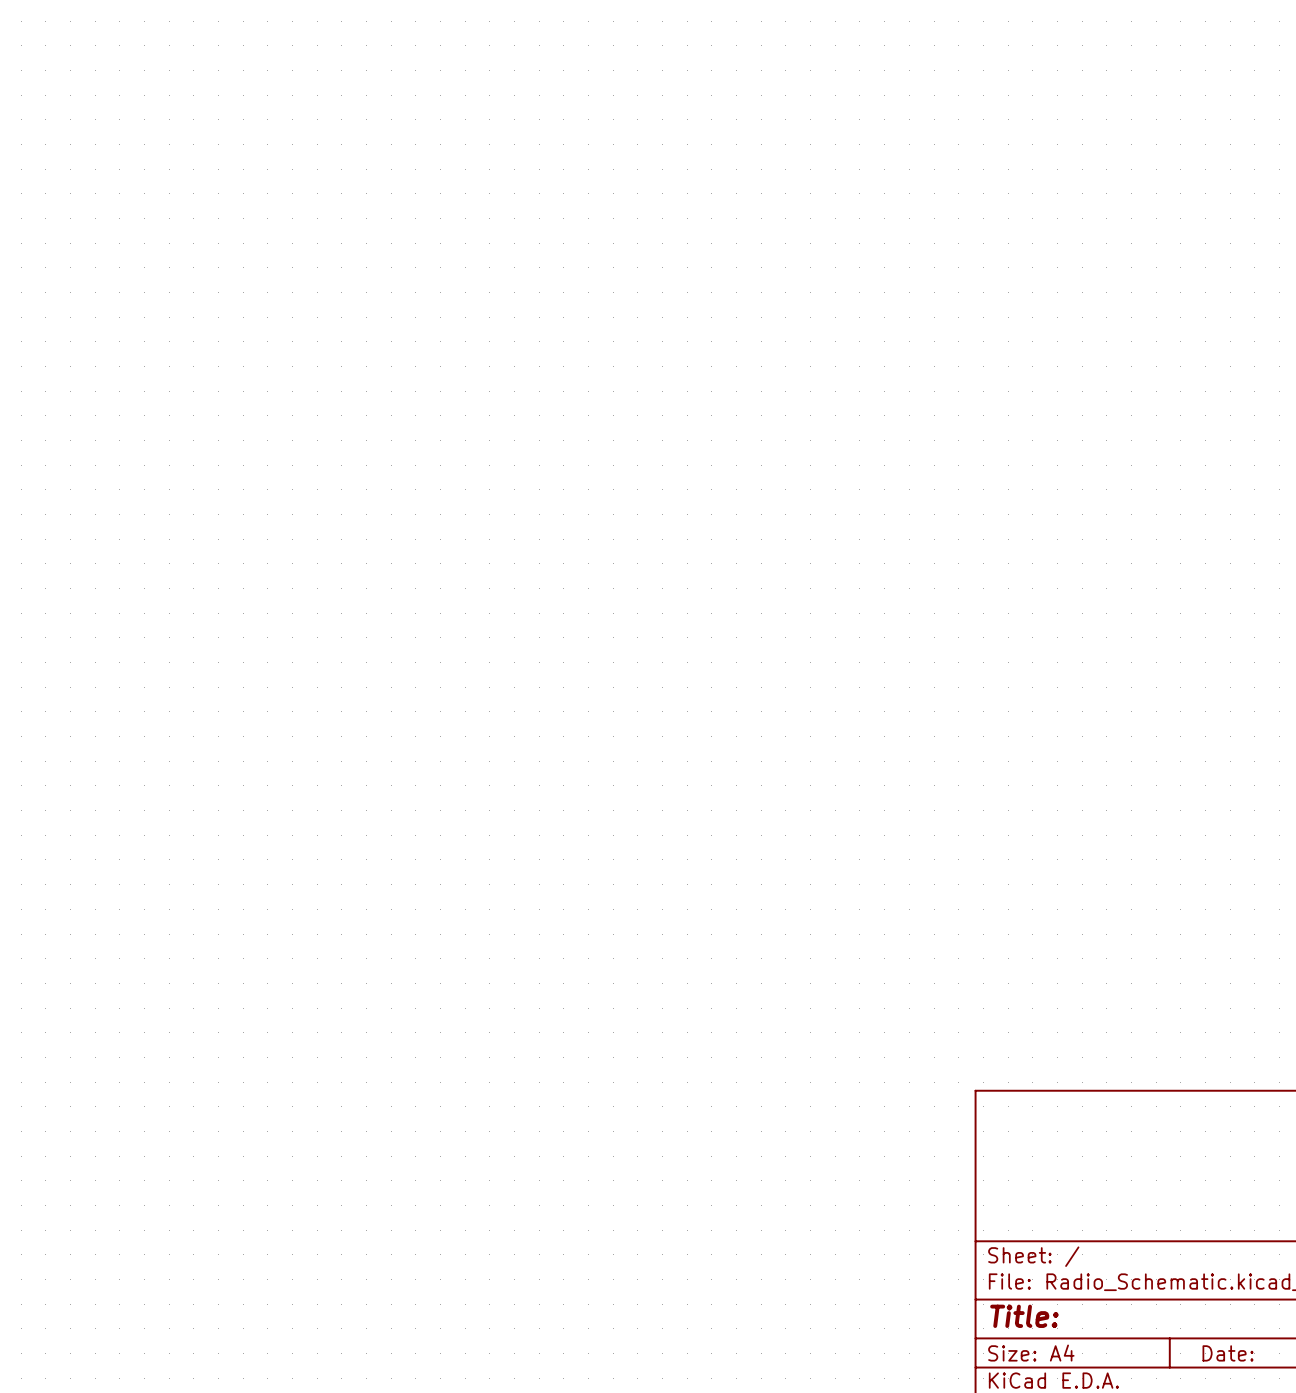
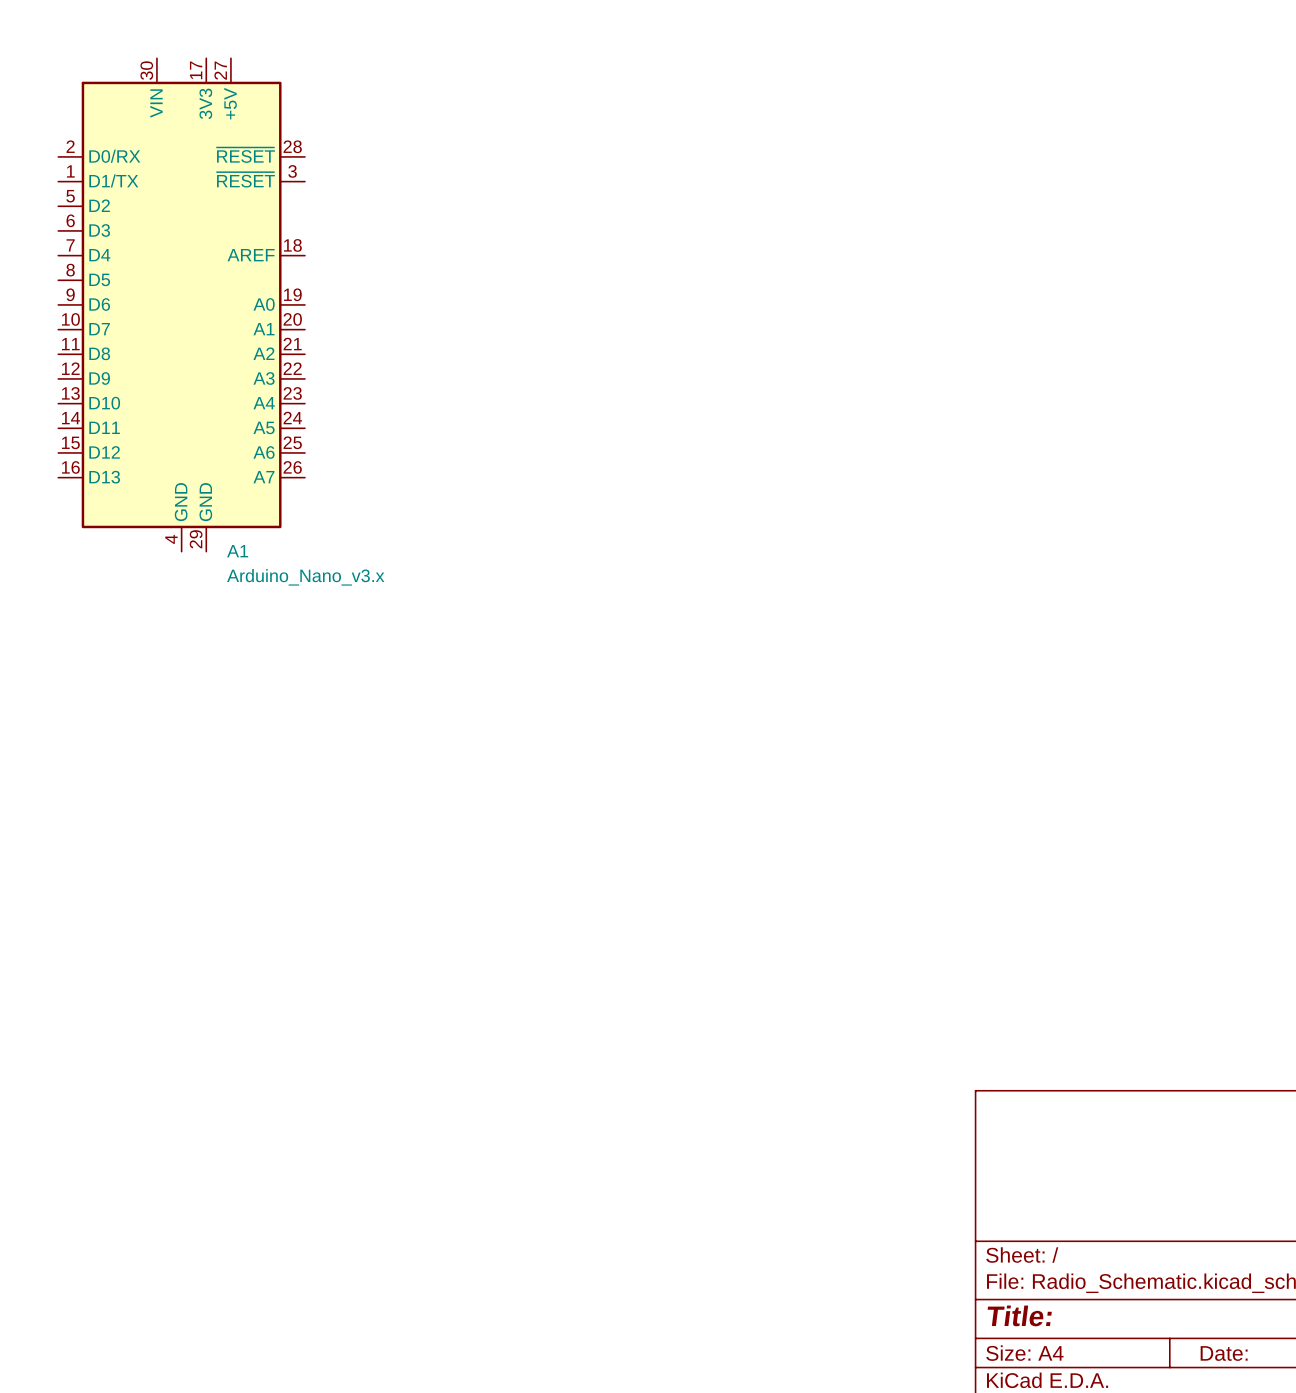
A1: none -> Arduino_Nano_v3.x (181, 304)

